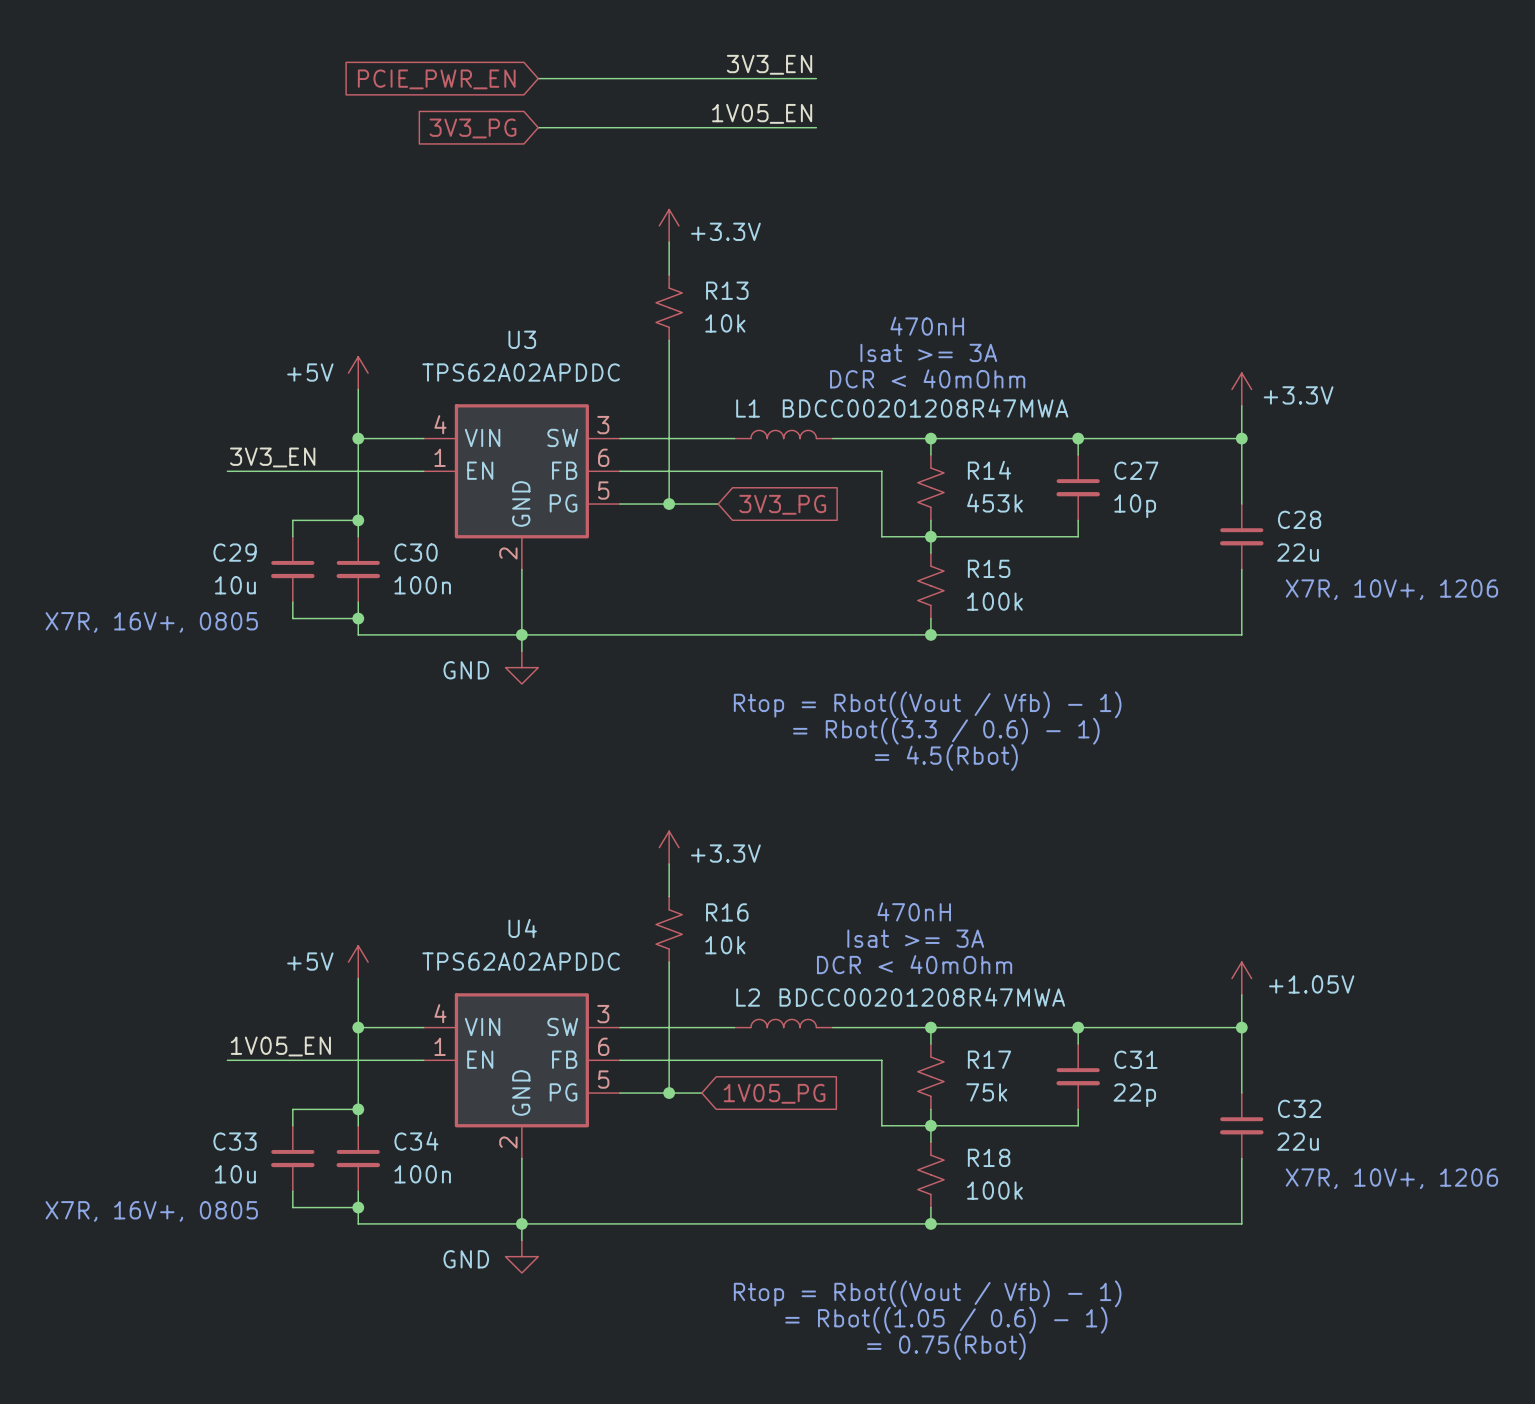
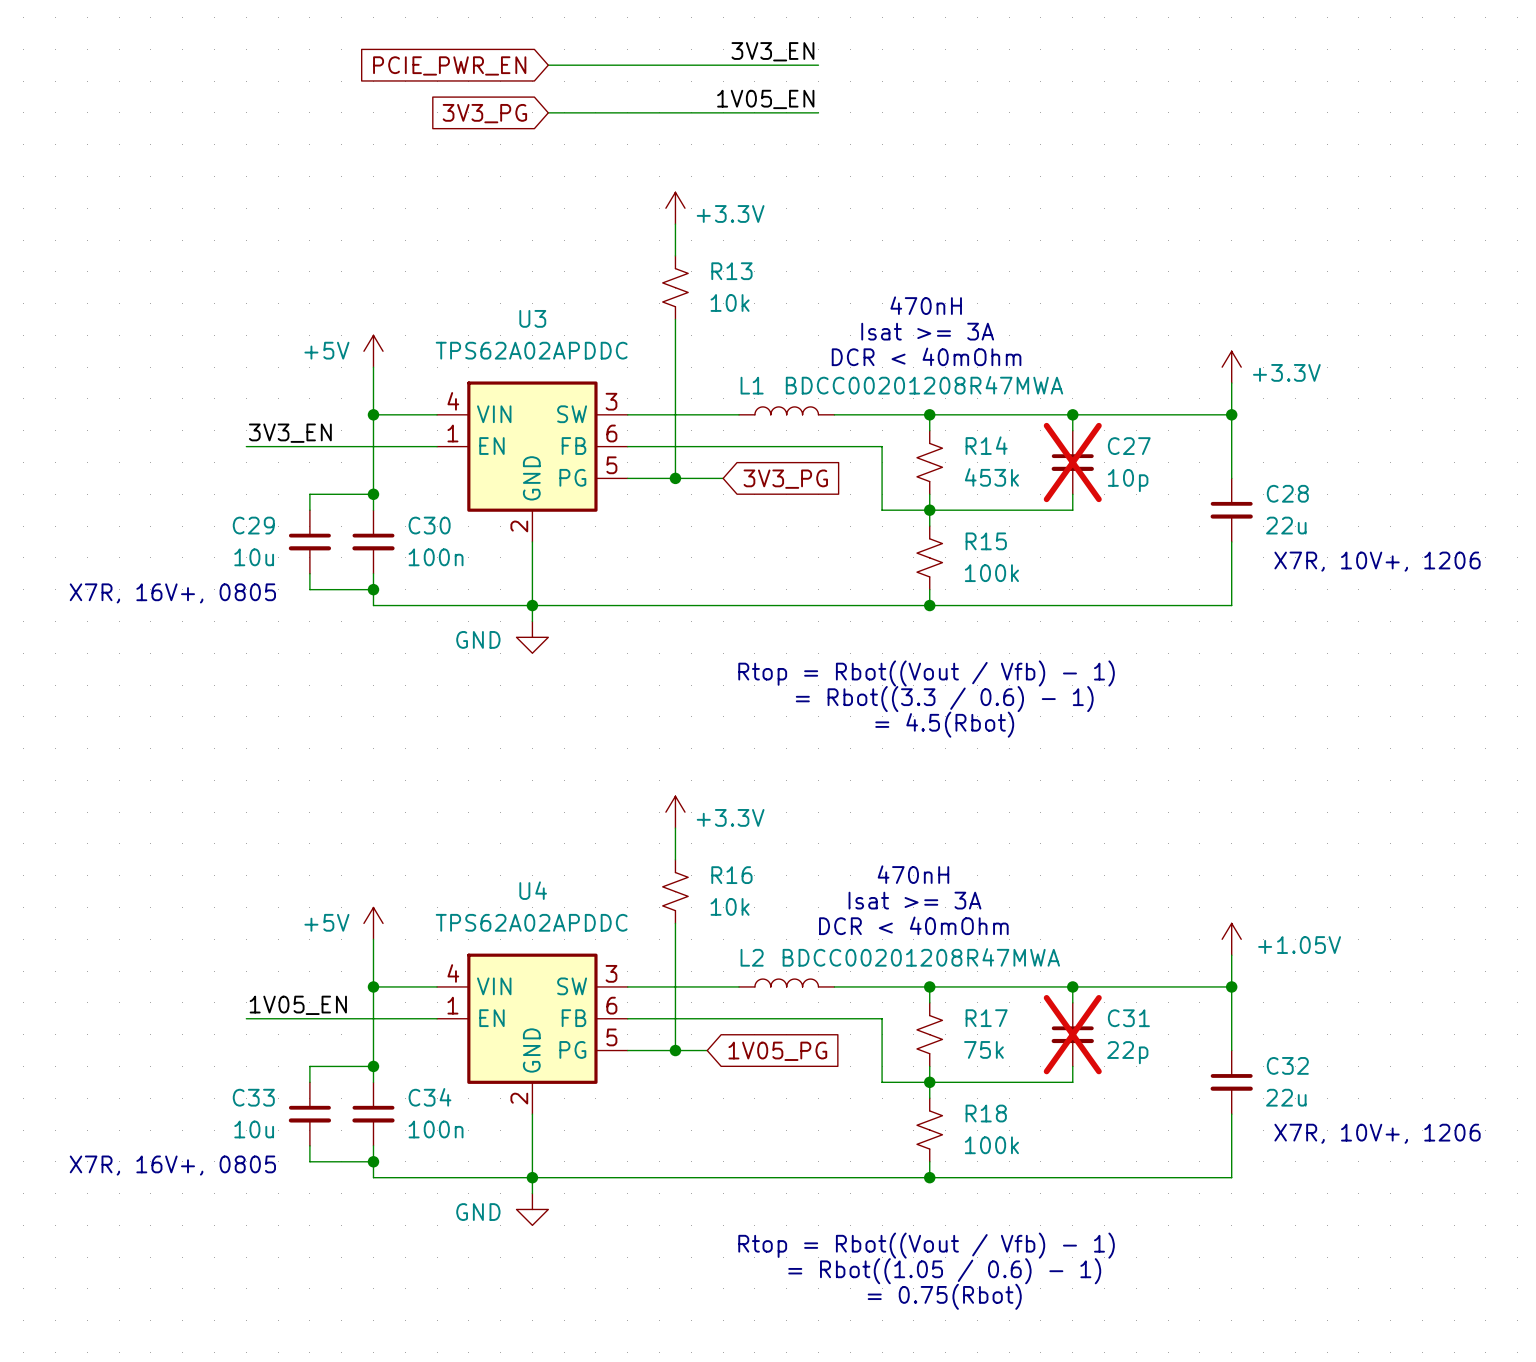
C27 do-not-place cross: none -> (1072, 462)
C31 do-not-place cross: none -> (1072, 1034)

